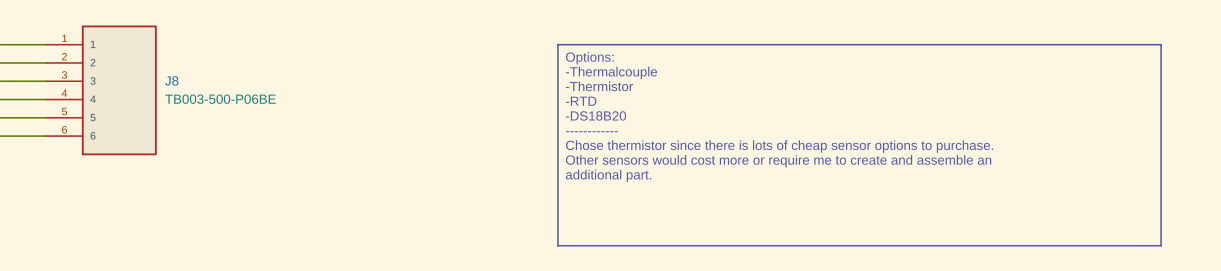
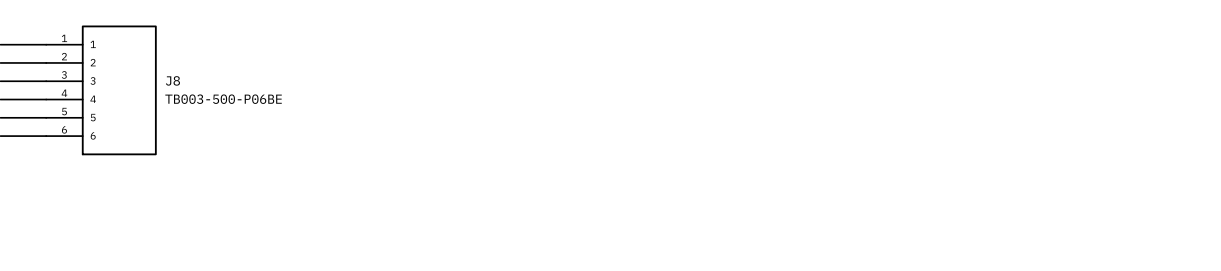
line: (557, 44) (1161, 44) (1161, 245) (557, 245) (557, 44) -> none
text: Options: (589, 58) -> none
text: -Thermalcouple (611, 72) -> none
text: -Thermistor (599, 86) -> none
text: -RTD (581, 101) -> none
text: -DS18B20 (596, 115) -> none
text: ------------ (591, 131) -> none
text: Chose thermistor since there is lots of cheap sensor options to purchase. (779, 146) -> none
text: Other sensors would cost more or require me to create and assemble an (778, 161) -> none
text: additional part. (608, 175) -> none

